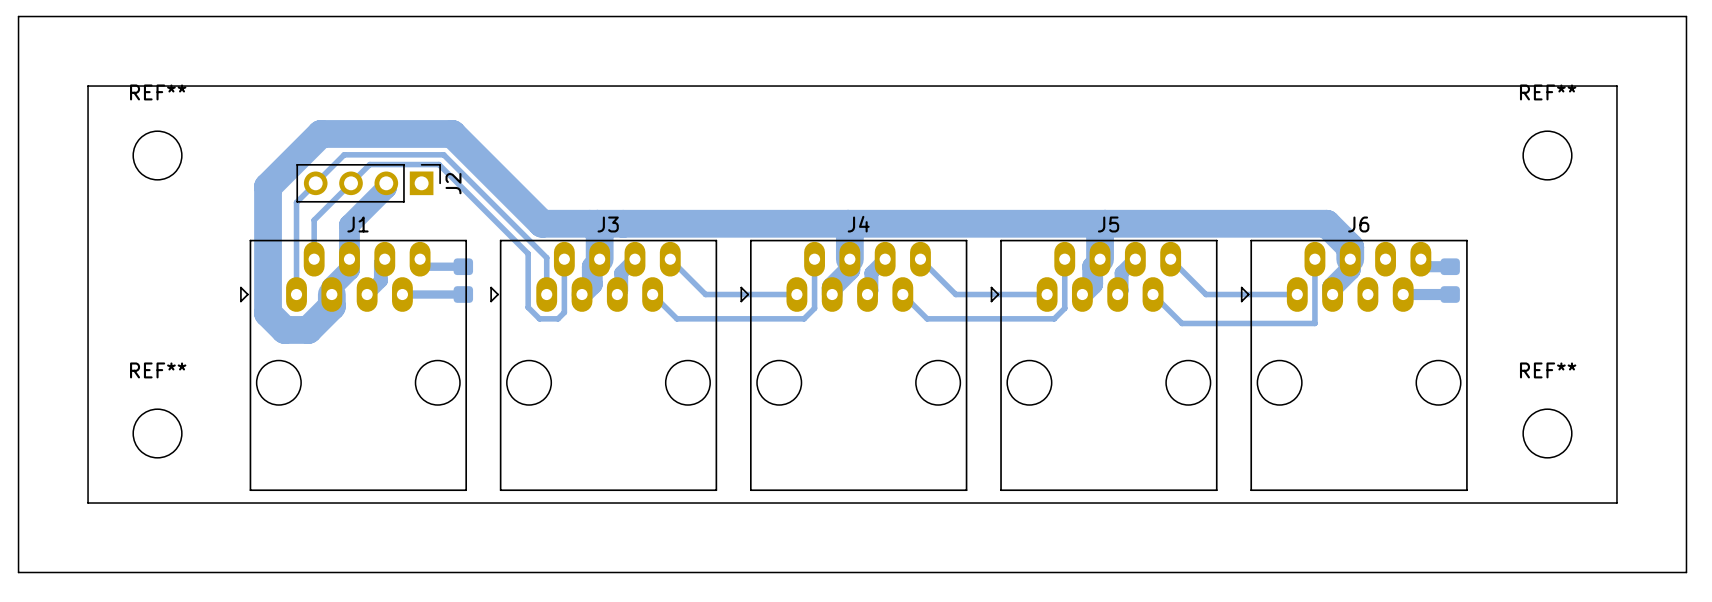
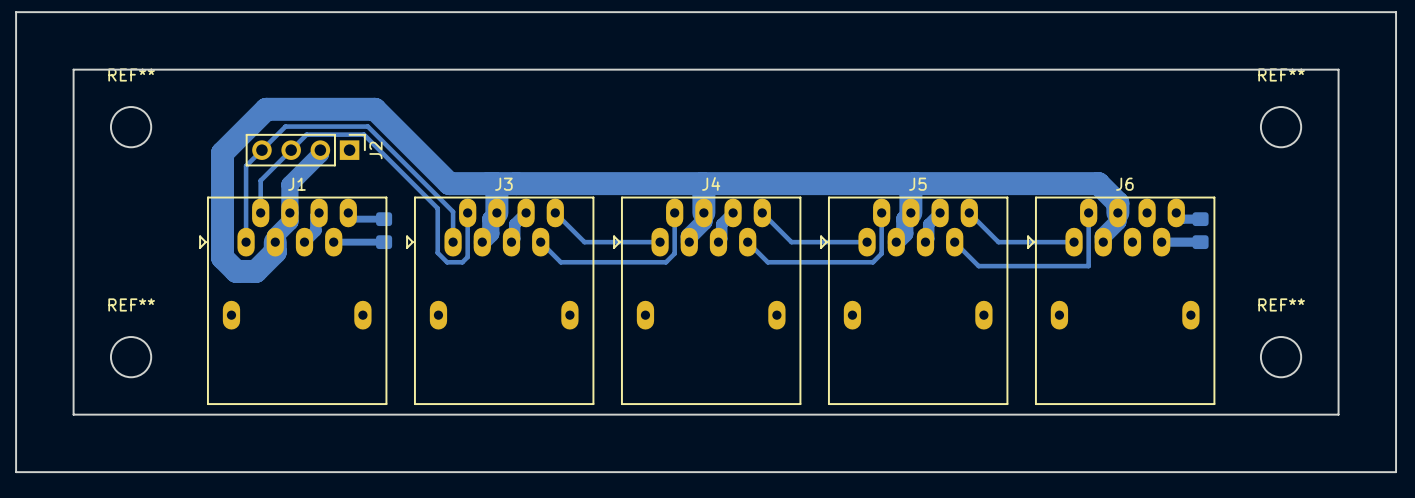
J1 footprint: [240, 239, 468, 492] -> [199, 196, 388, 405]
J3 footprint: [490, 239, 718, 492] -> [406, 196, 595, 405]
J4 footprint: [740, 239, 968, 492] -> [613, 196, 802, 405]
J5 footprint: [990, 239, 1218, 492] -> [820, 196, 1009, 405]
J6 footprint: [1240, 239, 1468, 492] -> [1027, 196, 1216, 405]

